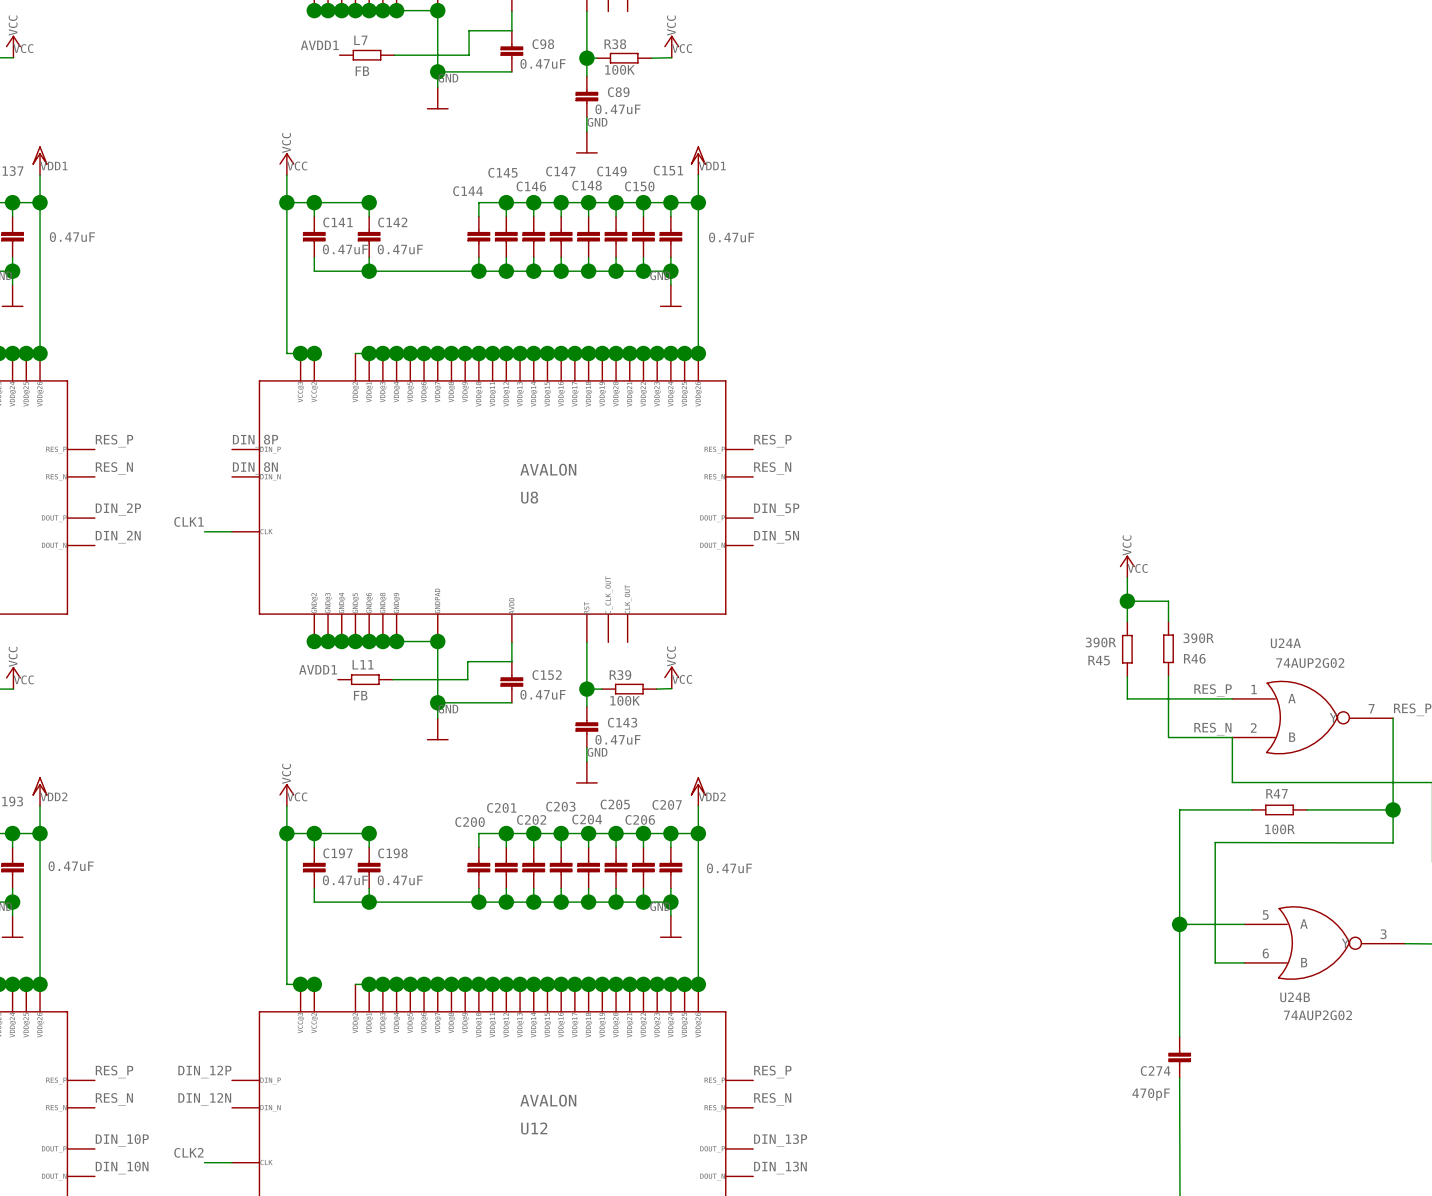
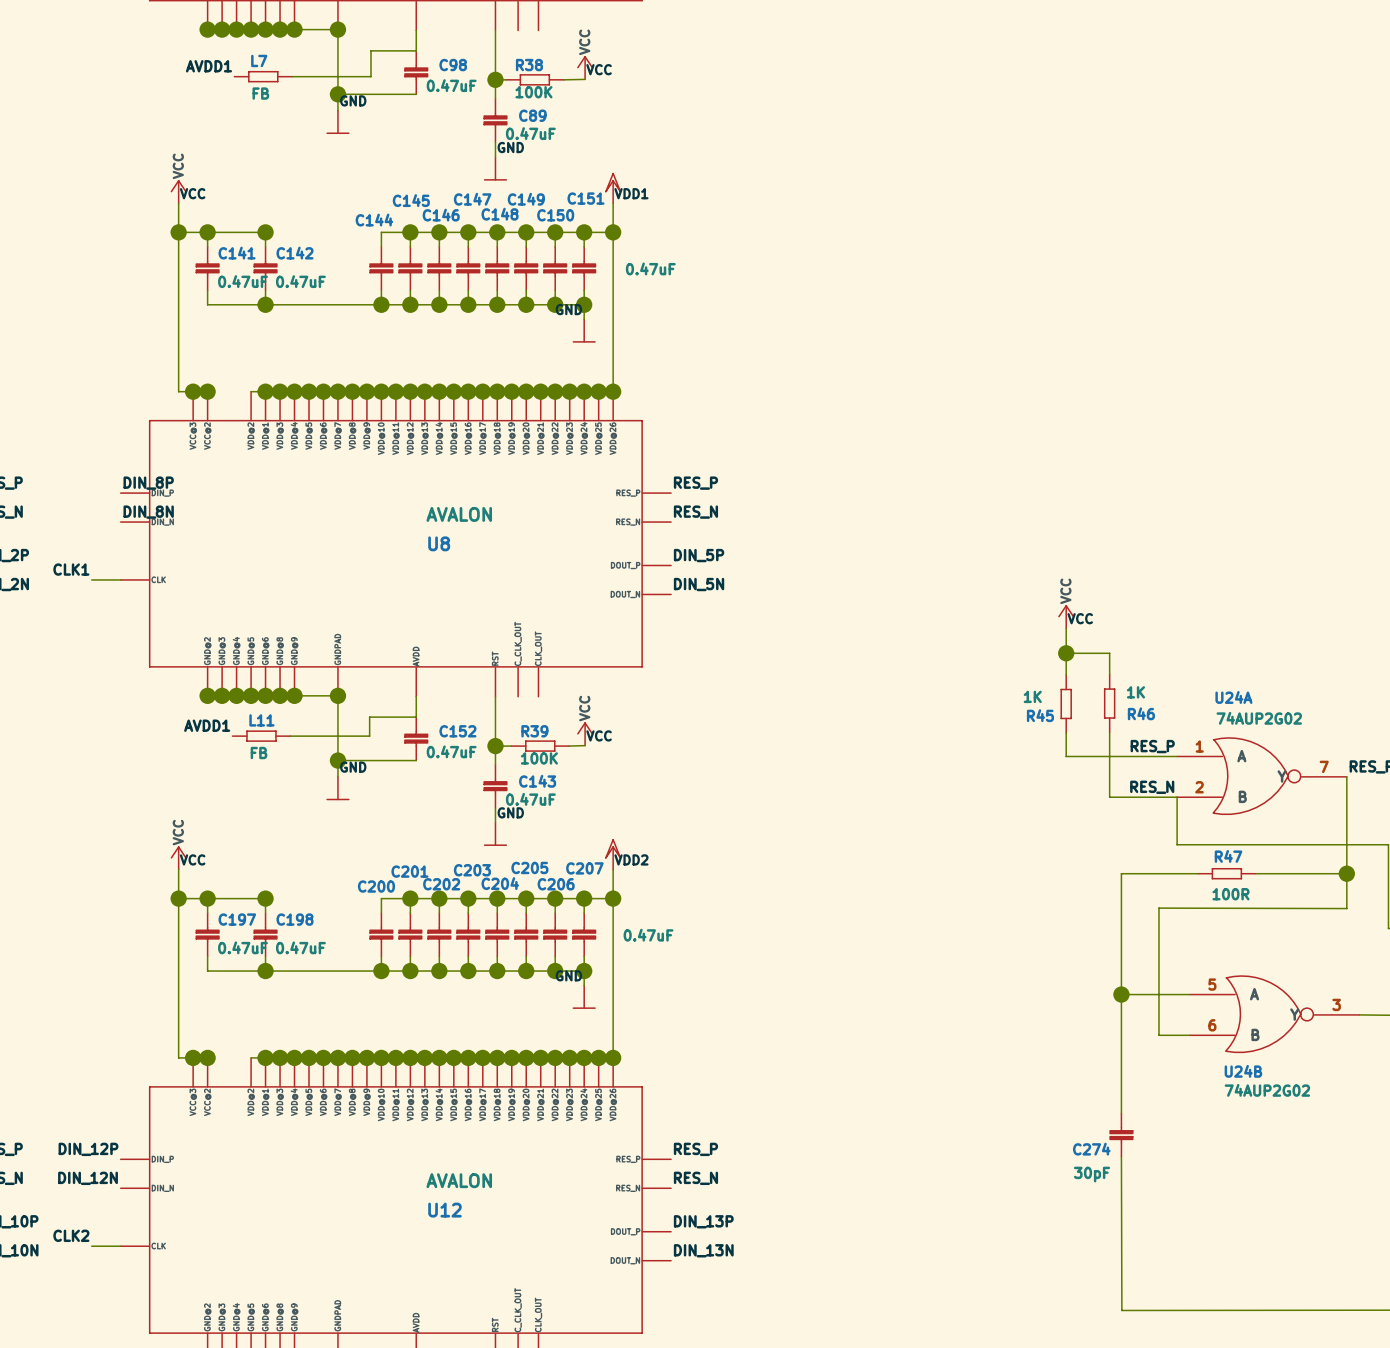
R46 value: 390R (1198, 638) -> 1K (1135, 692)
R45 value: 390R (1100, 642) -> 1K (1032, 696)
C274 value: 470pF (1151, 1094) -> 30pF (1092, 1174)

